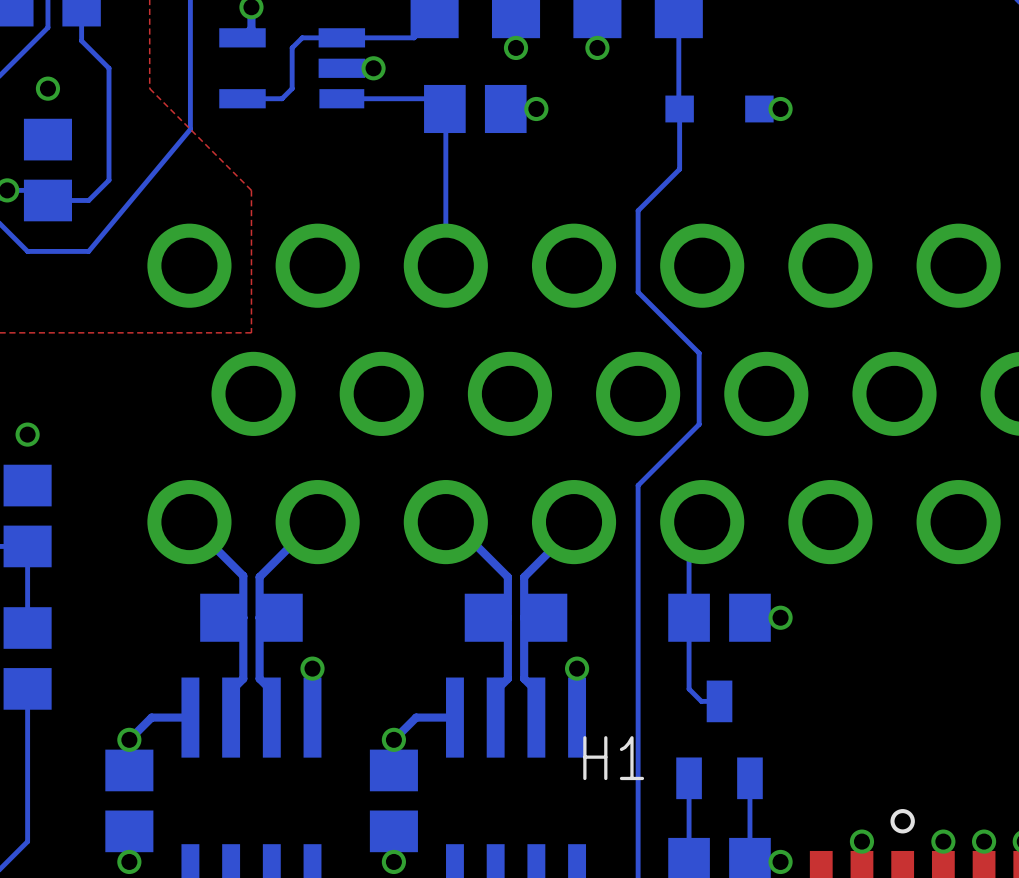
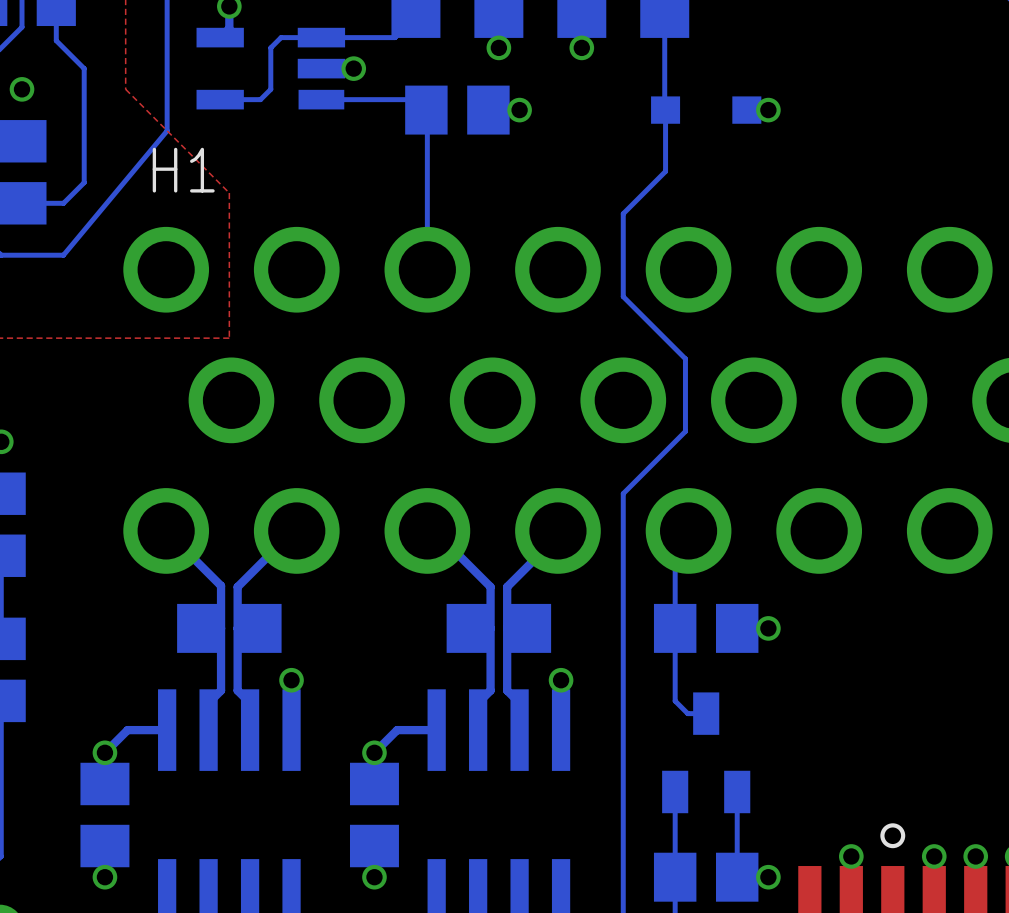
H1 name position: H1 (613, 758) -> H1 (183, 170)

